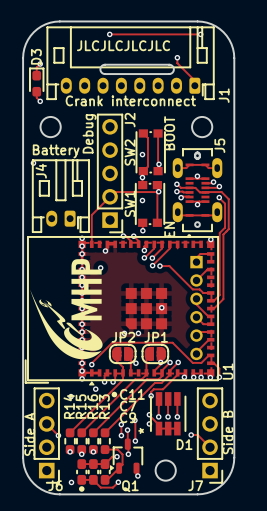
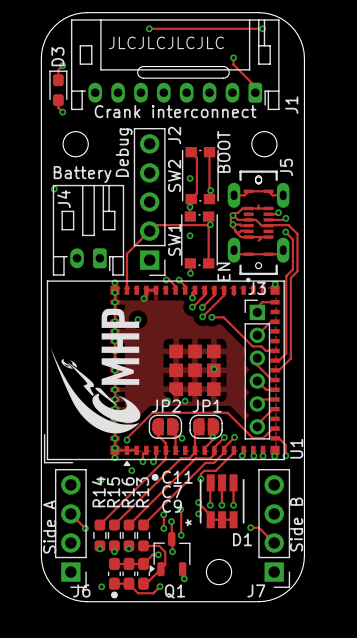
via: (197, 176) -> none
track: none -> (248, 208) (242, 208) (230, 218) (230, 225) (235, 231) (240, 237) (248, 237)
via: (181, 197) -> none
via: (197, 204) -> none
J3 side: bottom (196, 308) -> top (257, 369)

